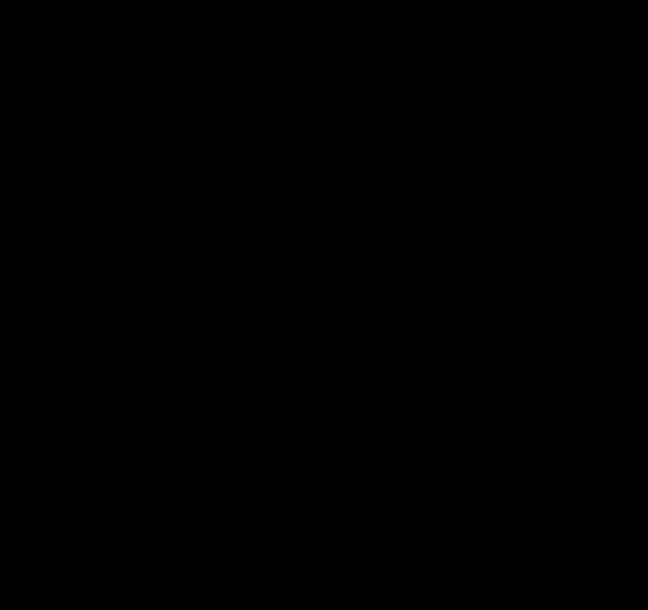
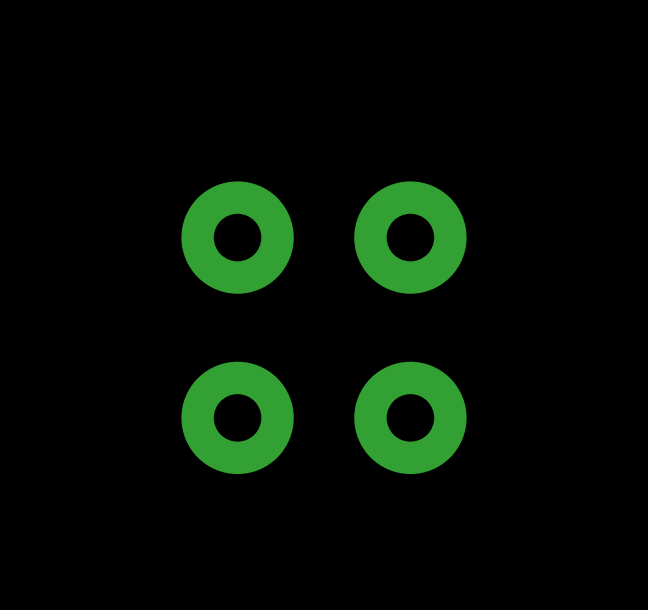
part: none -> (323, 237)
part: none -> (323, 417)

